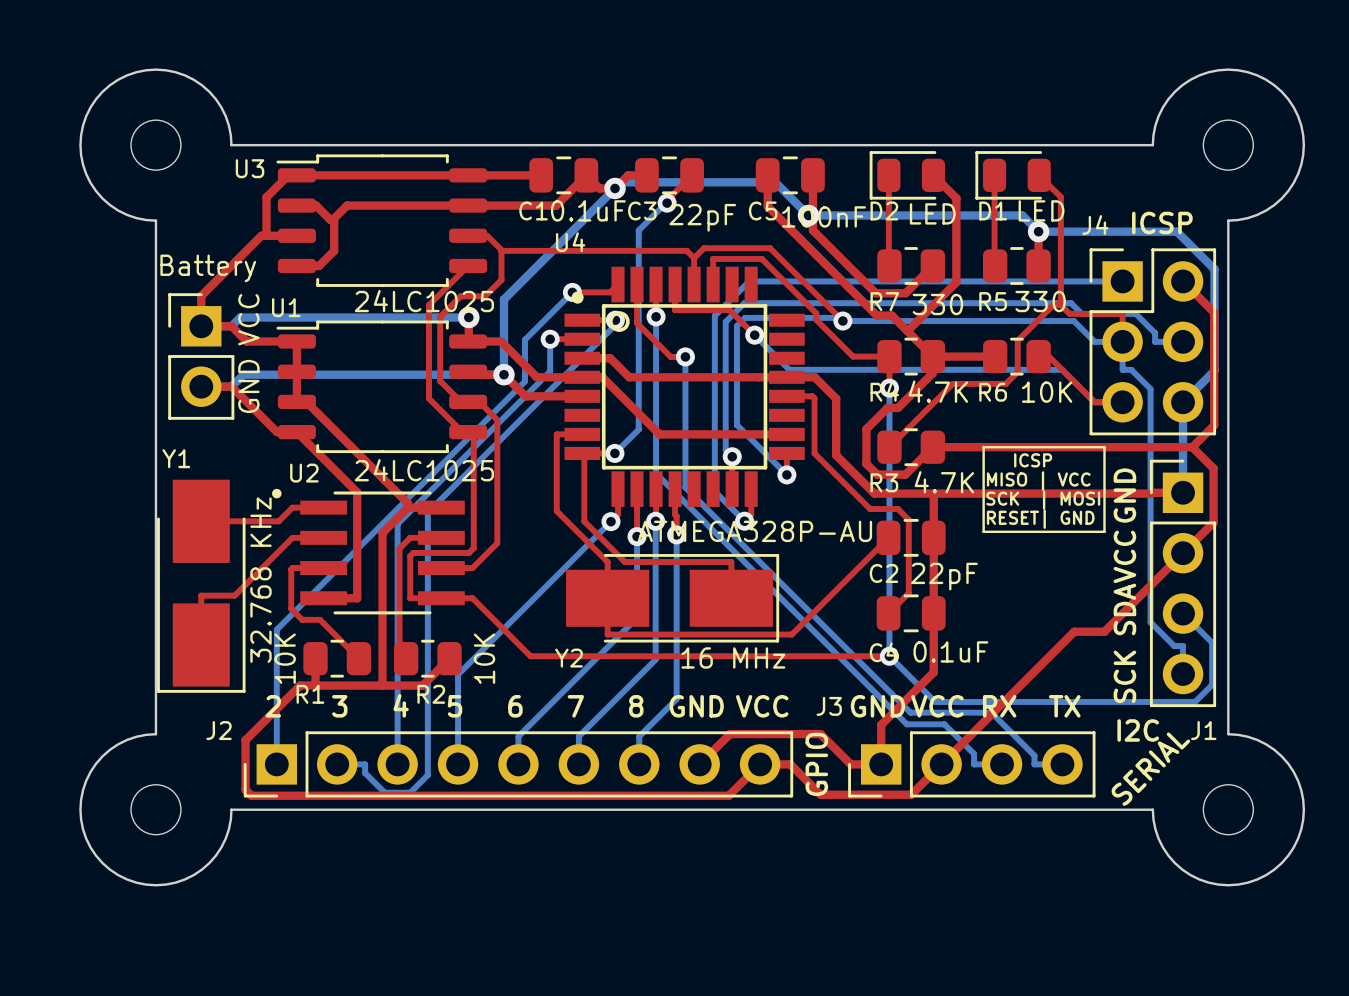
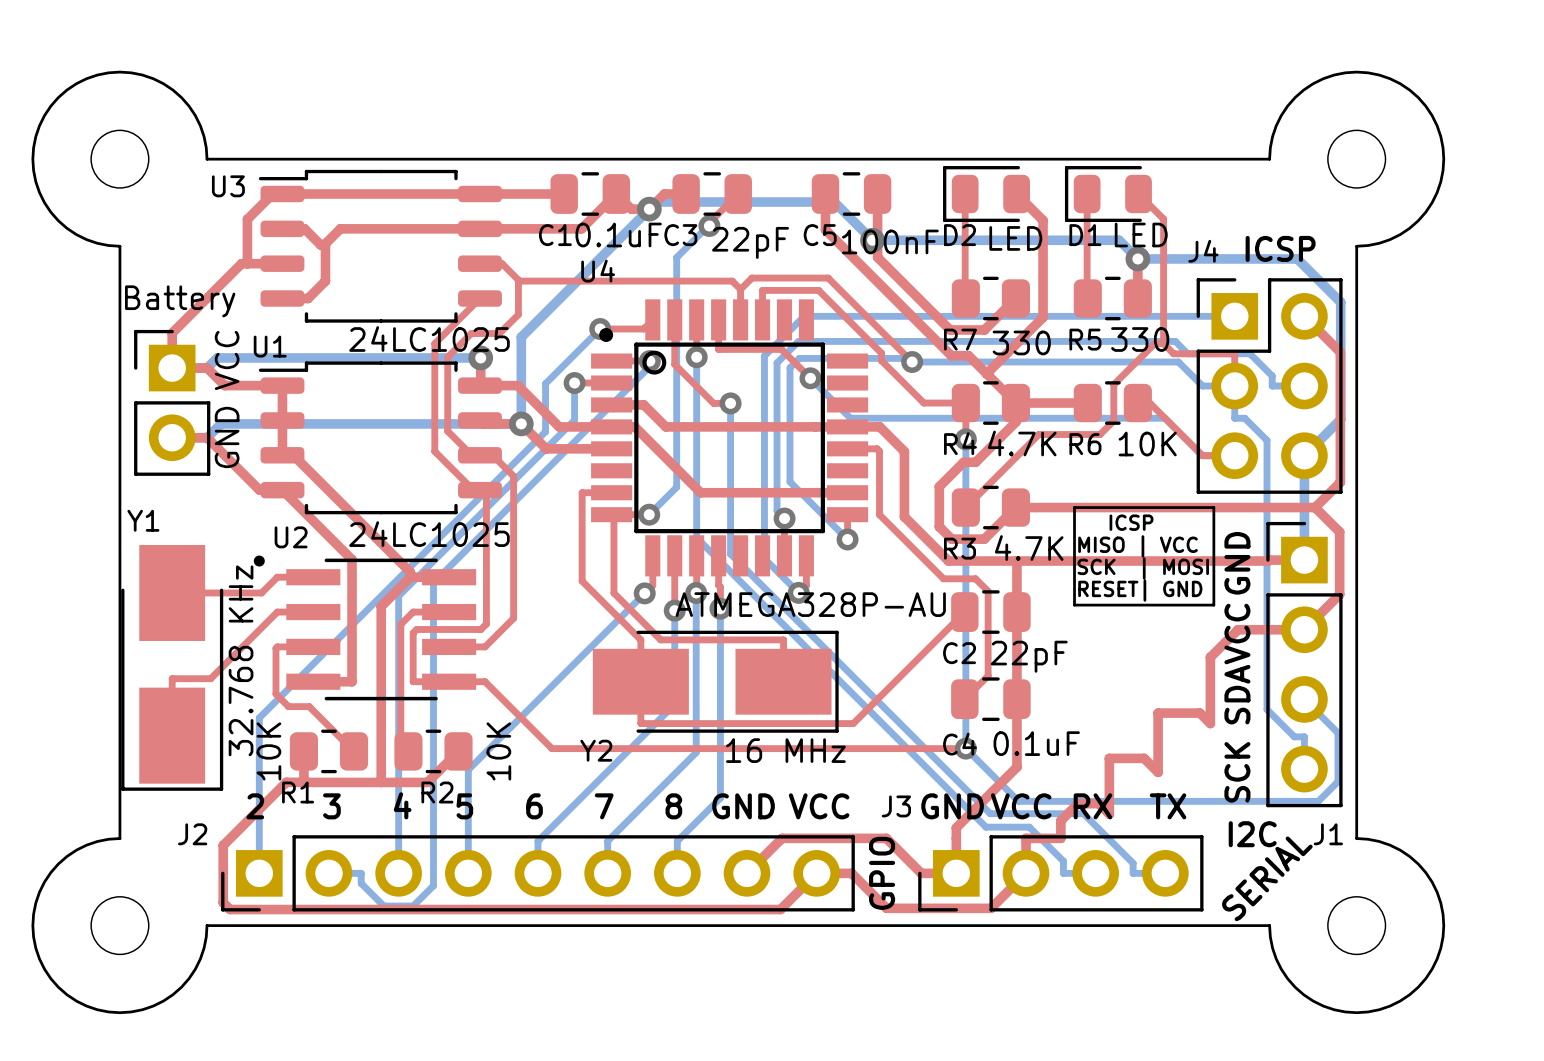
top track: (1183, 553) (1104, 631) (1074, 631) (941, 764) -> (1304, 629) (1237, 629) (1210, 657) (1210, 723) (1199, 713) (1158, 713) (1158, 772) (1144, 758) (1109, 758) (1109, 814) (1098, 803) (1077, 803) (1060, 820) (1060, 838) (1026, 838) (1026, 873)

